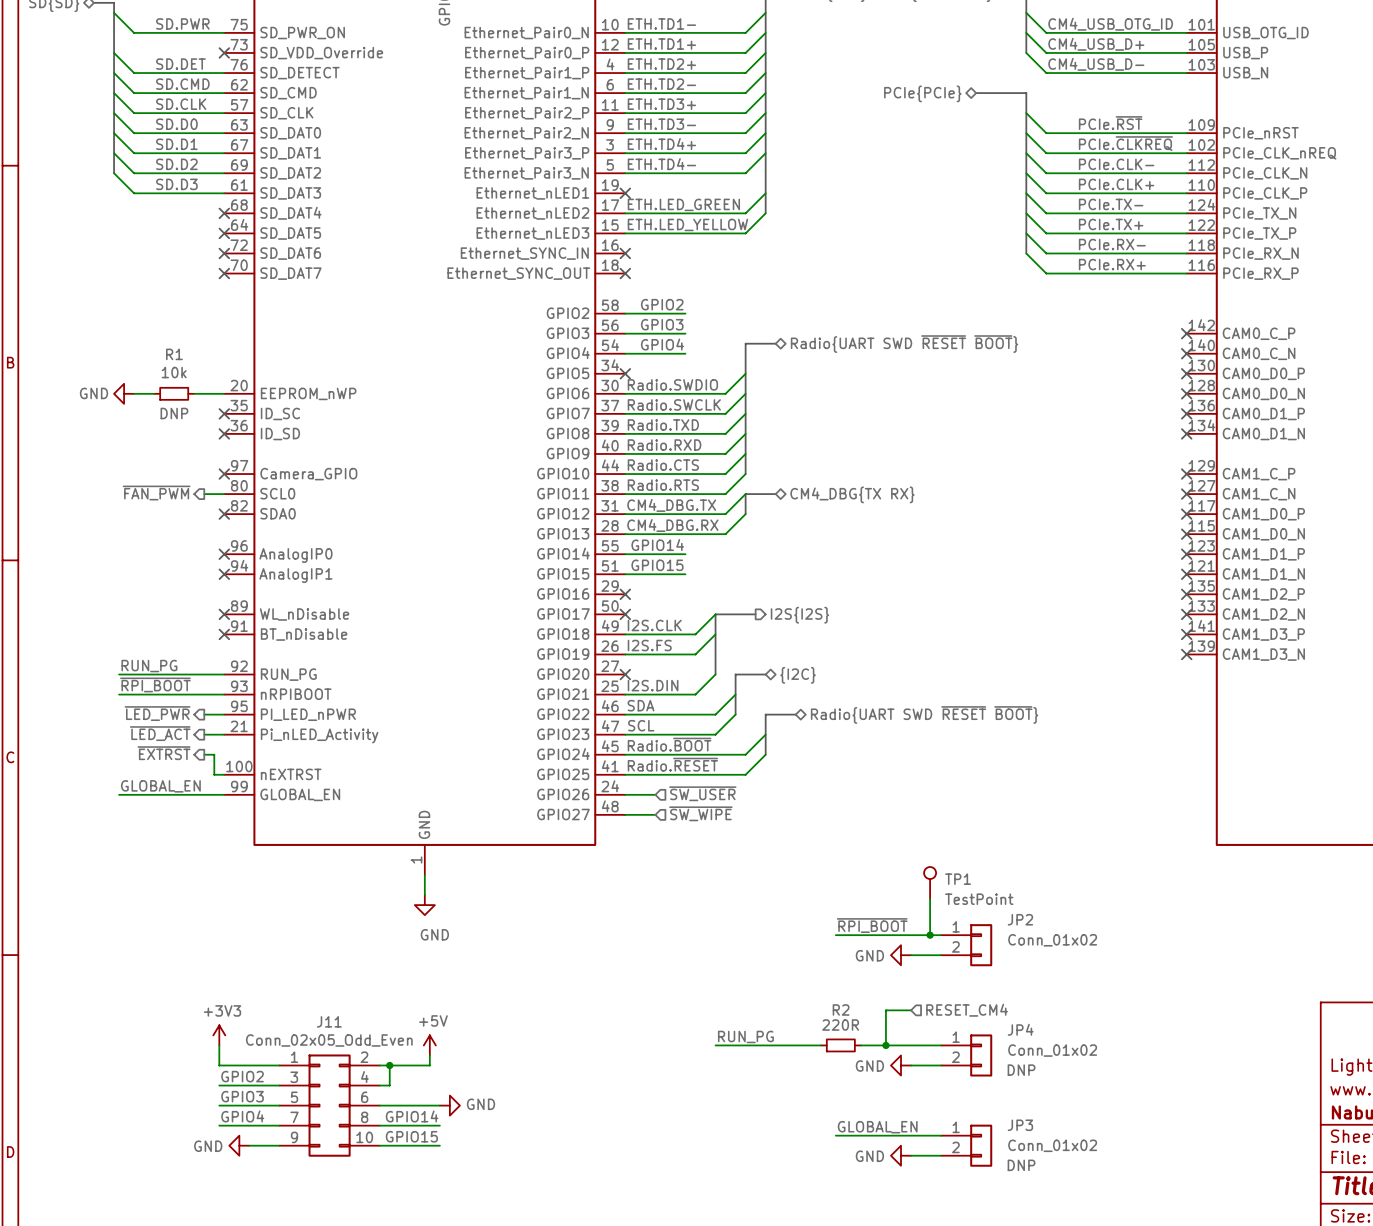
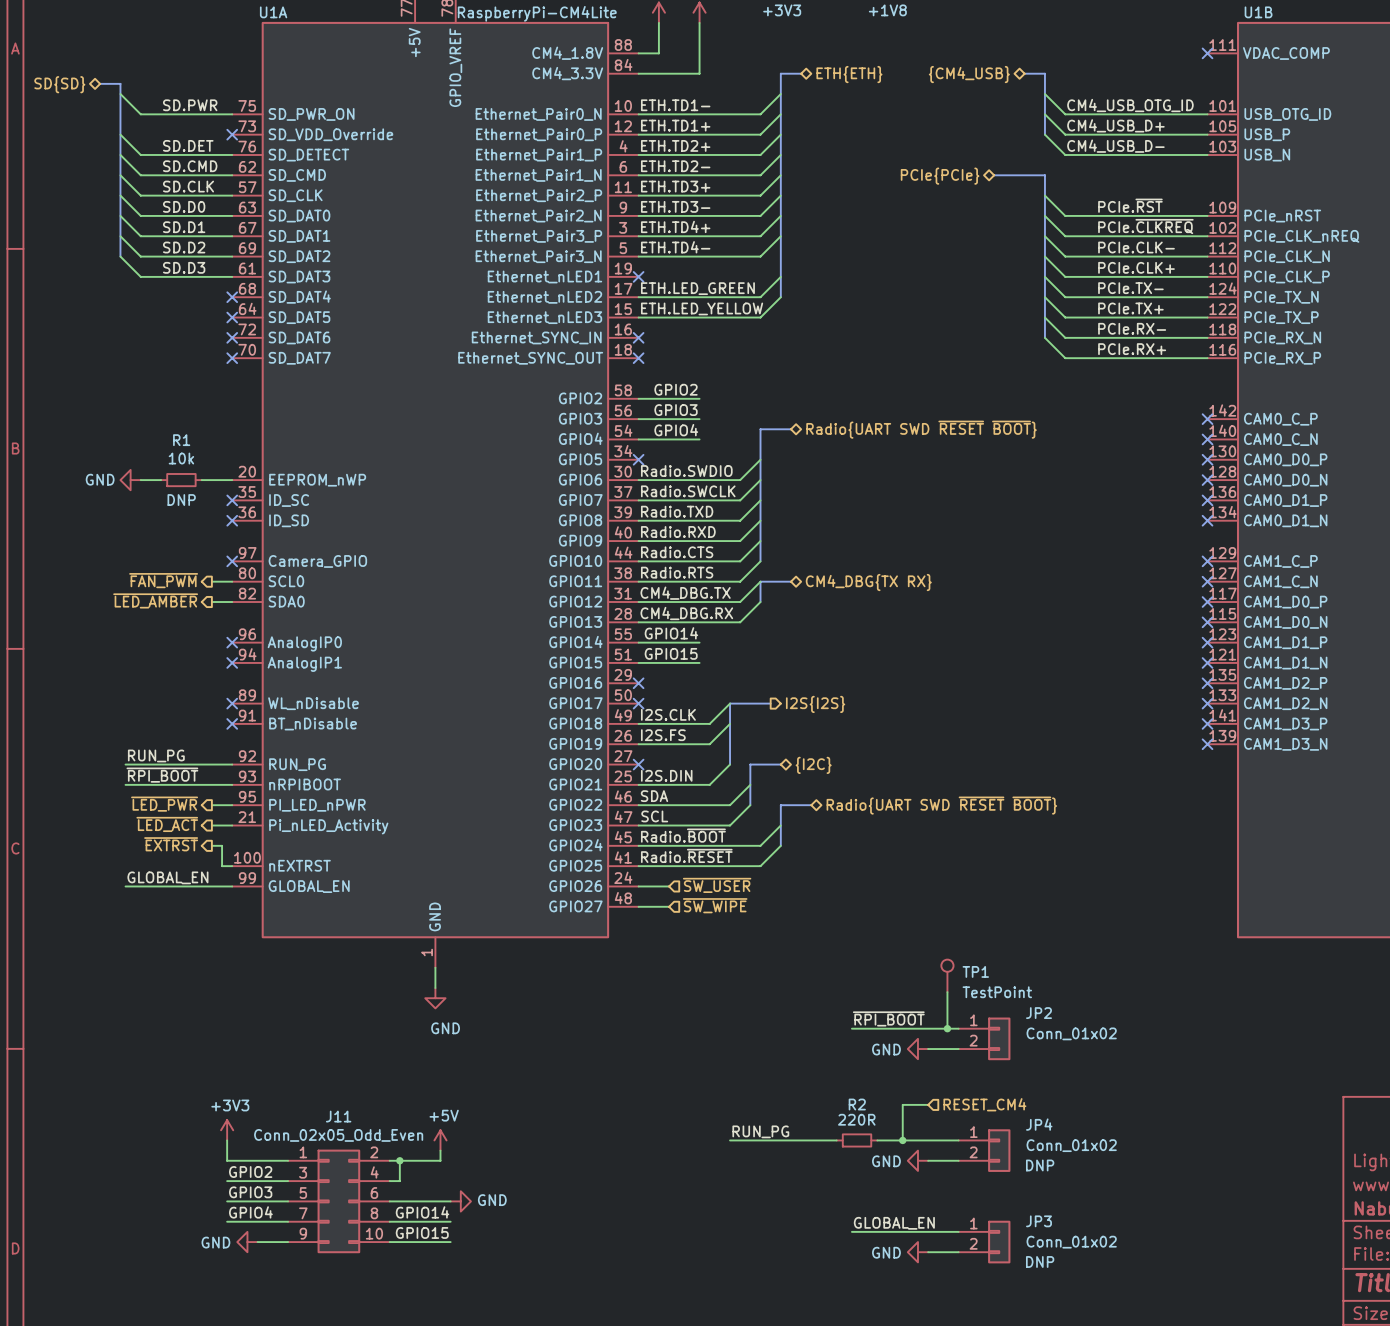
hierarchical label: none -> ~{LED_AMBER} (155, 600)
wire: none -> (211, 602) (232, 602)
no-connect mark: (224, 514) -> none

